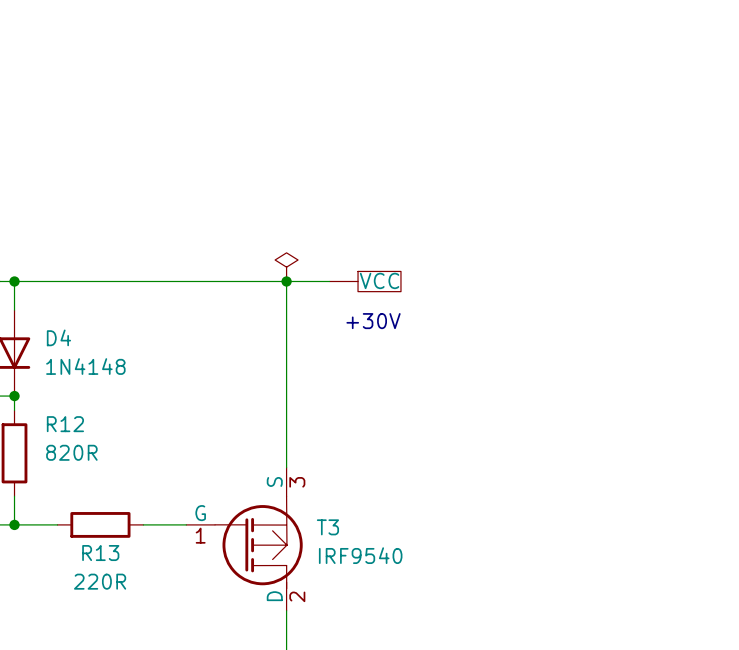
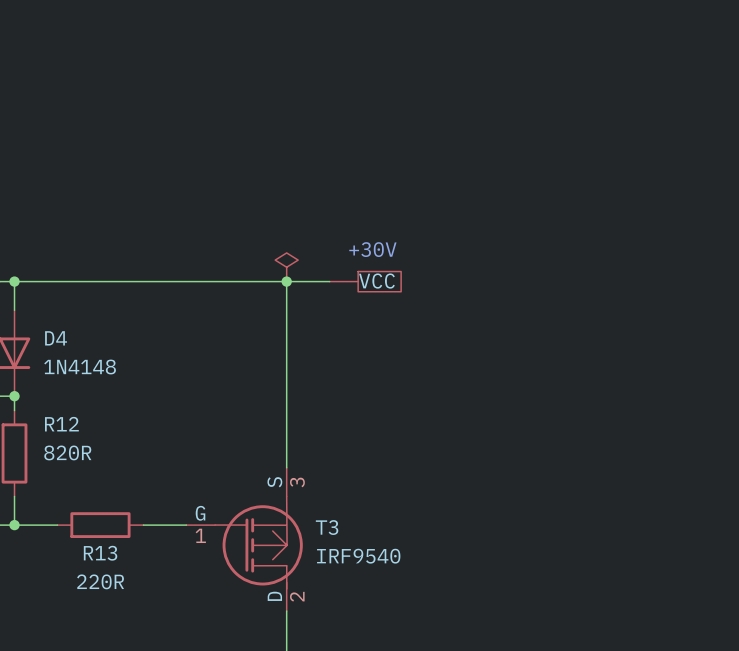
text position: +30V (373, 321) -> +30V (372, 249)

